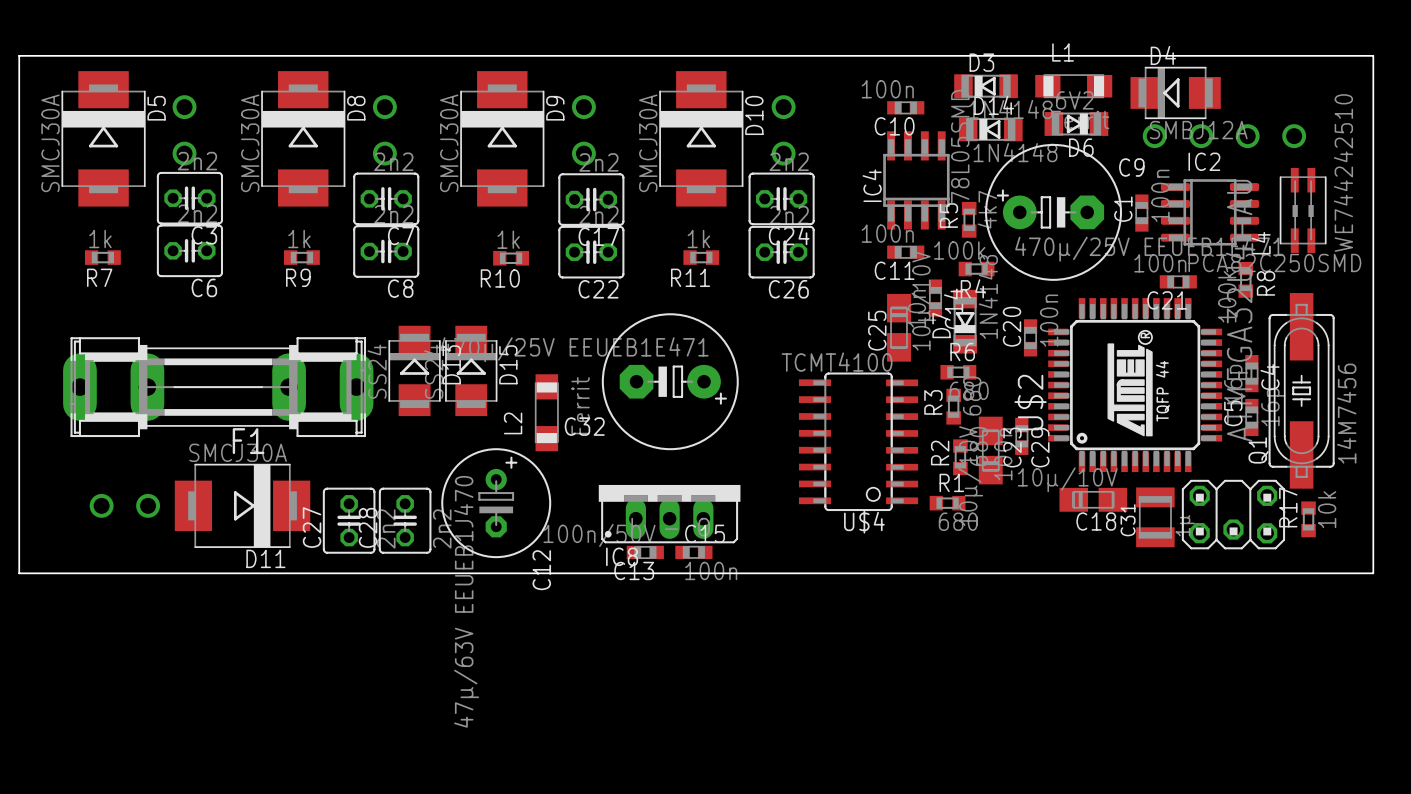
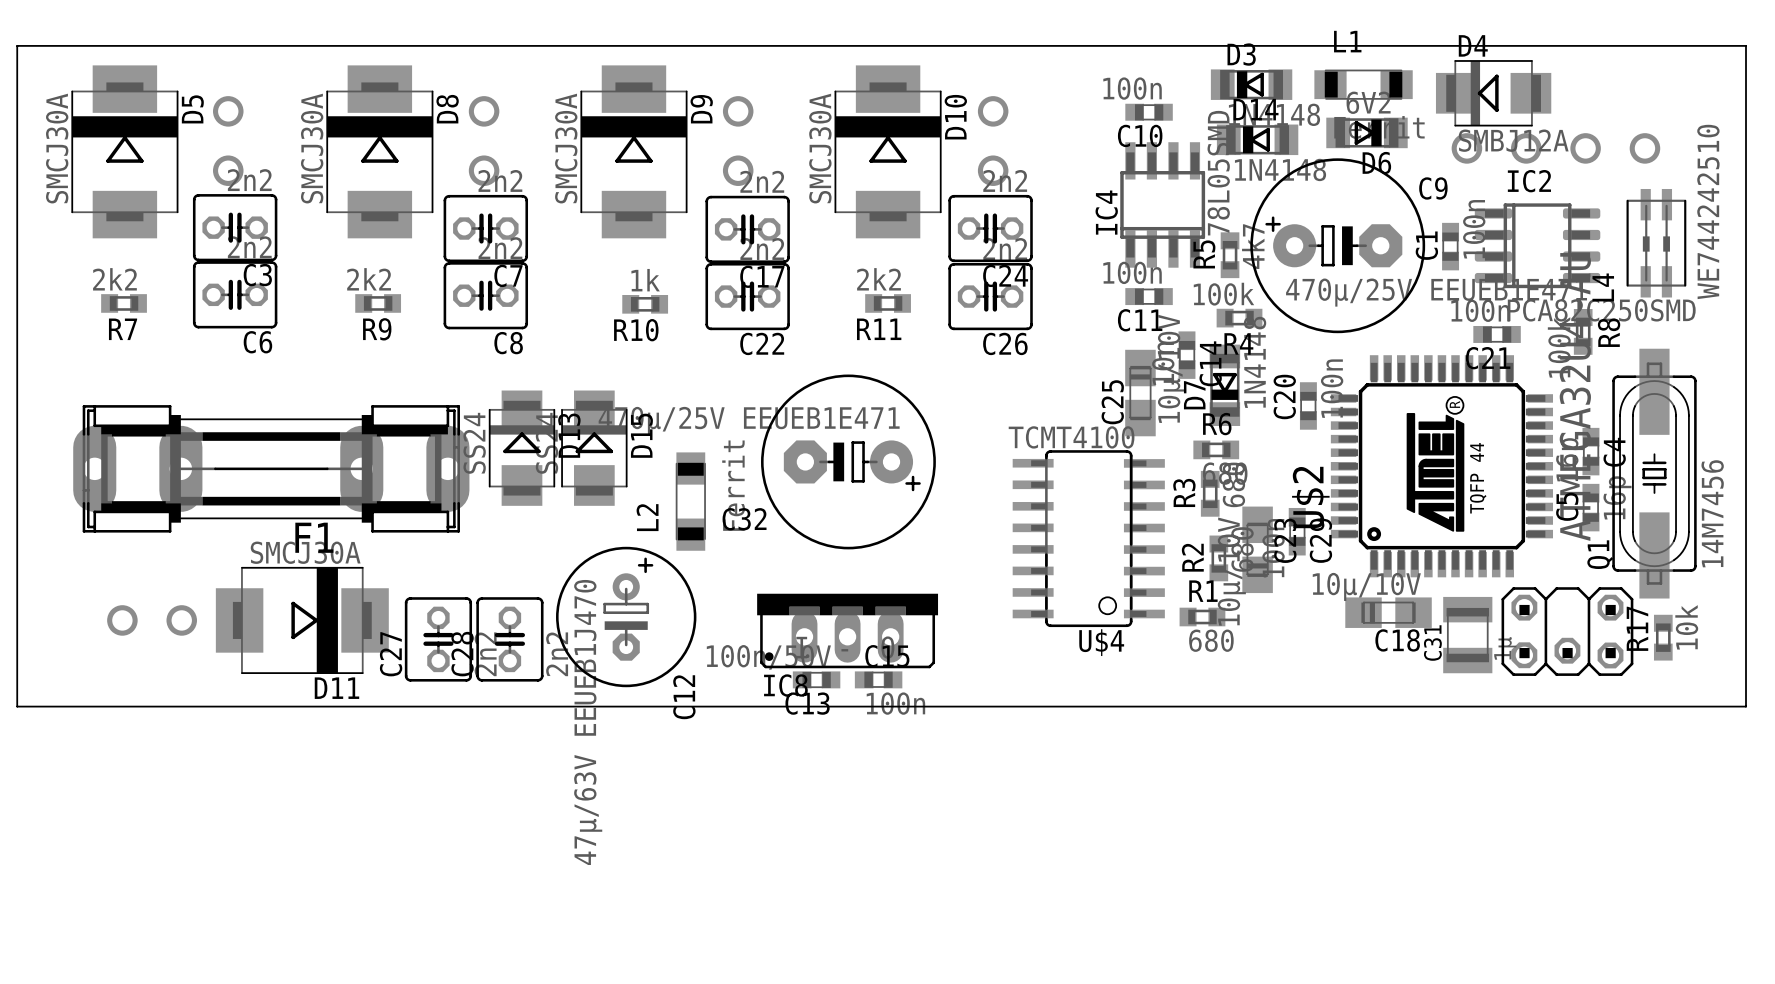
R7 value: 1k (100, 239) -> 2k2 (114, 279)
R9 value: 1k (299, 239) -> 2k2 (369, 279)
R11 value: 1k (698, 239) -> 2k2 (878, 279)

